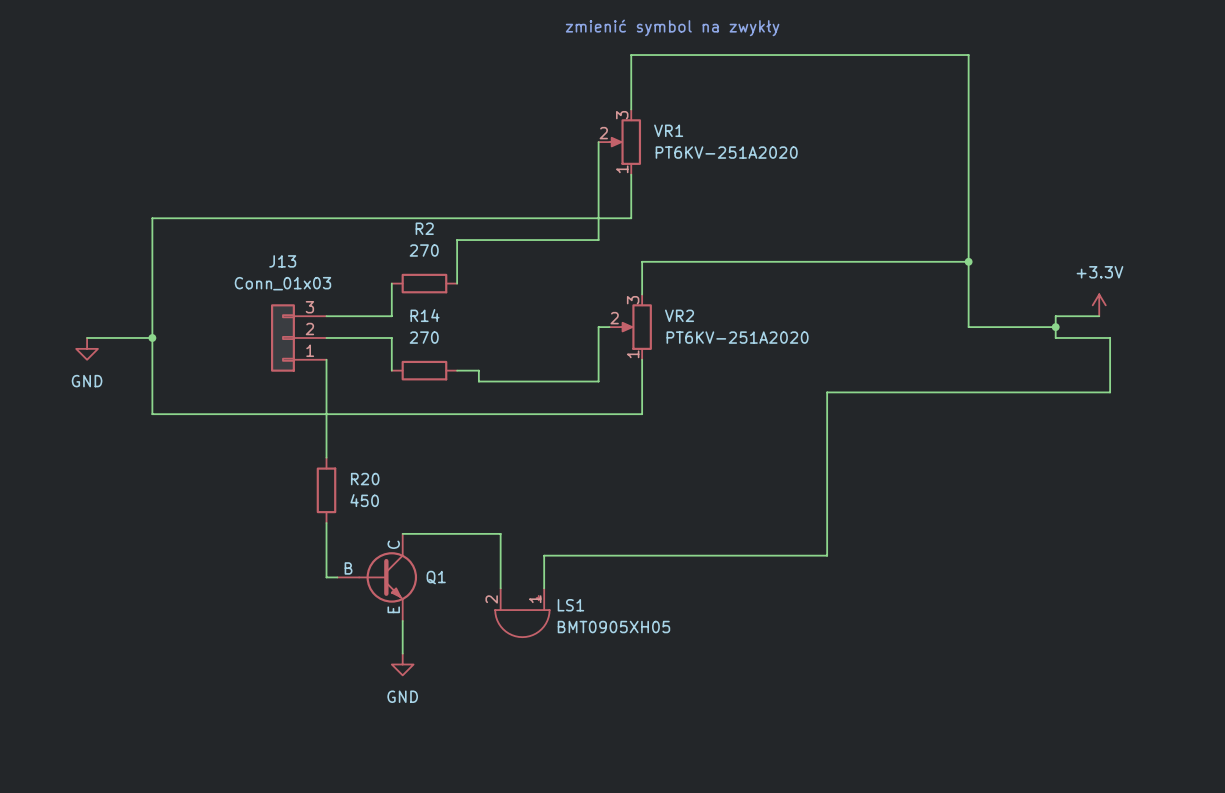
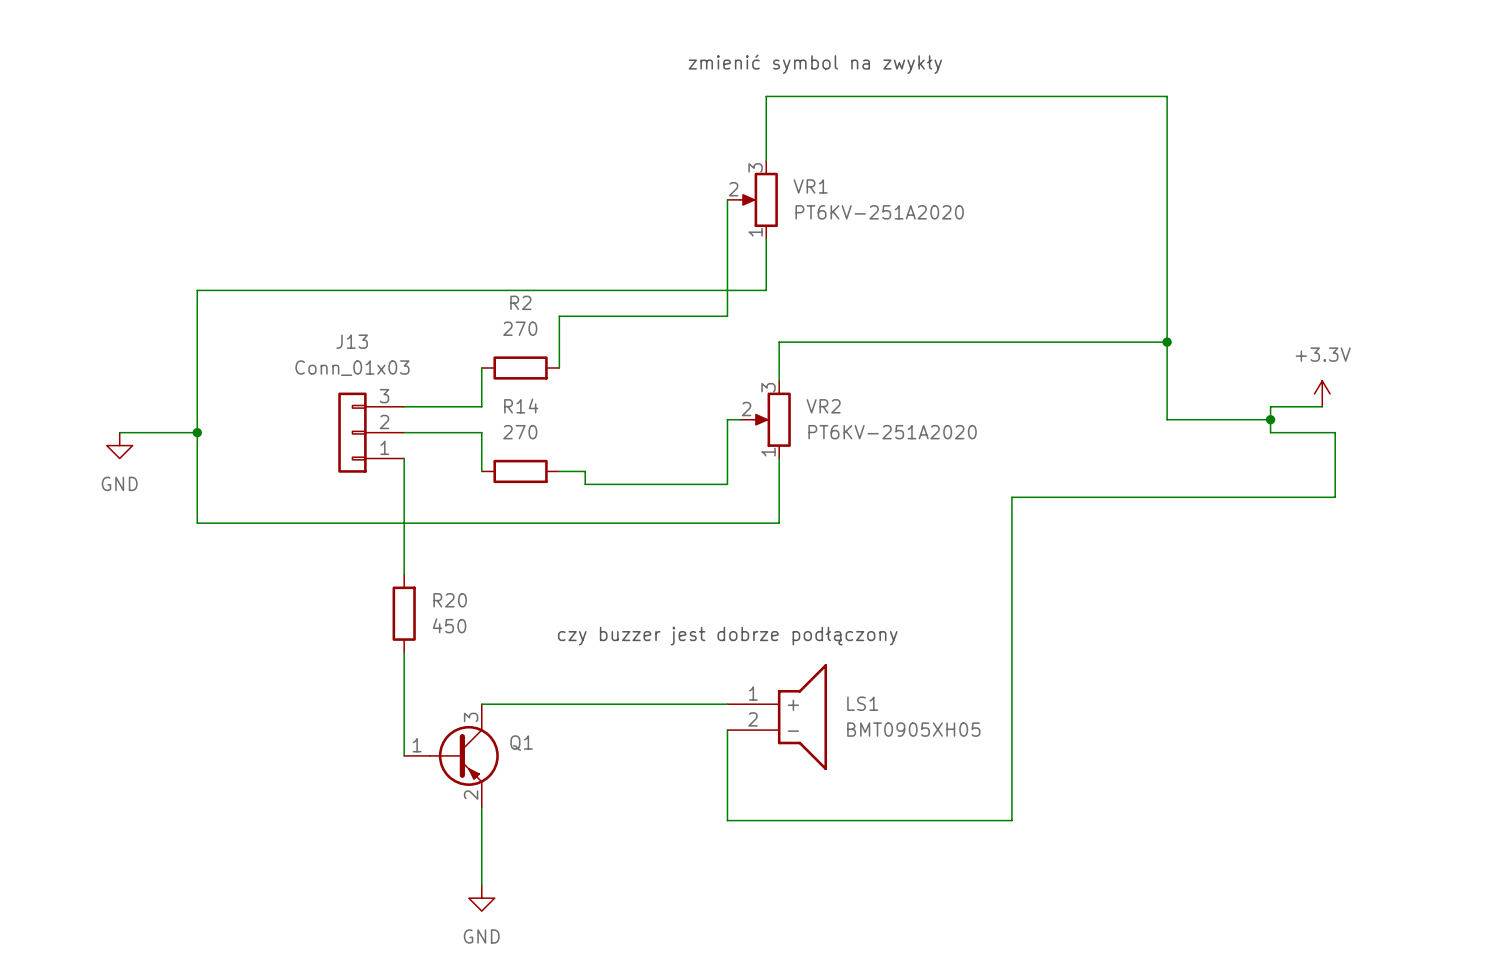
wire: (838, 392) (827, 392) (827, 555) (544, 555) (544, 588) -> (1011, 497) (1011, 820) (727, 820) (727, 730)
text: none -> czy buzzer jest dobrze podłączony (727, 636)
Q1 symbol: [337, 533, 418, 621] -> [404, 704, 499, 808]
wire: (402, 533) (500, 533) (500, 588) -> none
wire: none -> (481, 704) (727, 704)
wire: (326, 577) (337, 577) -> (404, 717) (404, 755)
LS1 symbol: [495, 588, 550, 638] -> [727, 664, 828, 771]
LS1 name position: LS1 (570, 605) -> LS1 (862, 703)
wire: (402, 620) (402, 653) -> none
LS1 value position: BMT0905XH05 (613, 627) -> BMT0905XH05 (913, 729)
wire: none -> (481, 807) (481, 885)
power symbol position: GND (402, 664) -> GND (481, 898)

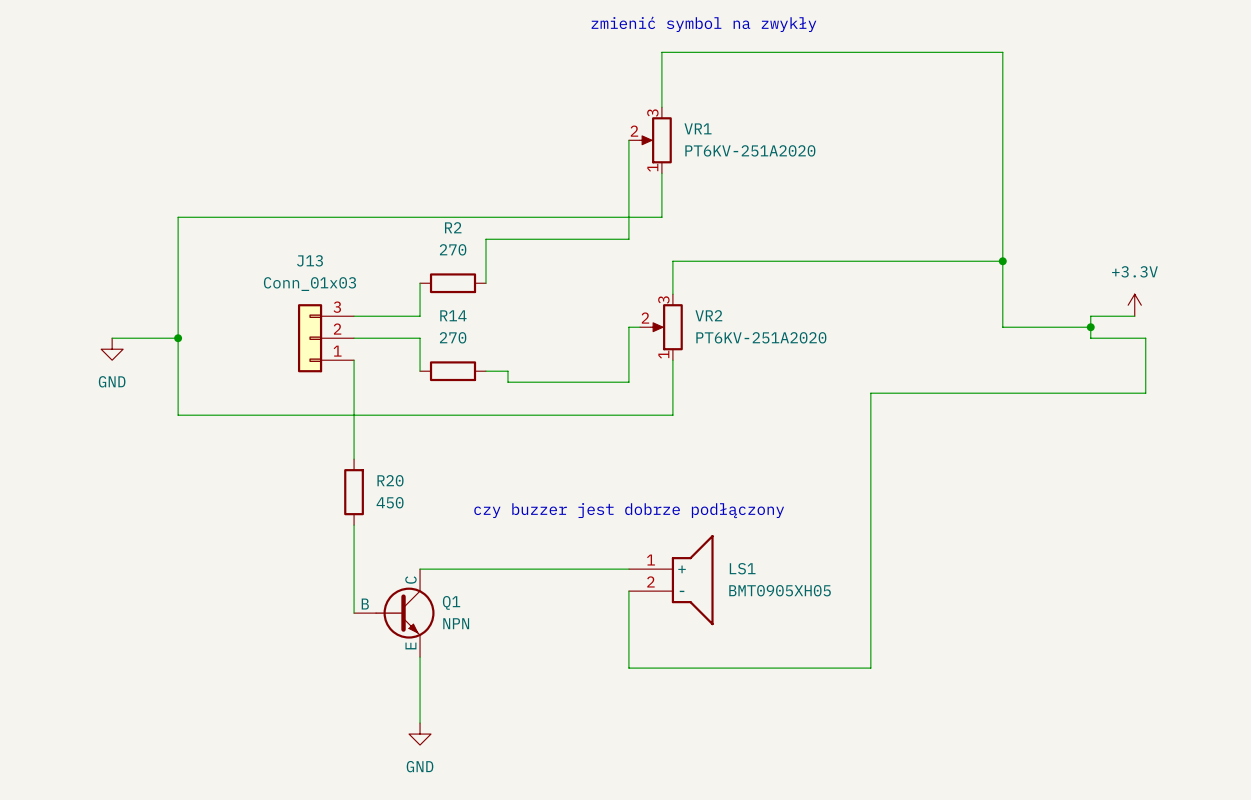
Q1 symbol: [404, 704, 499, 808] -> [354, 569, 435, 658]
Q1 value: none -> NPN (456, 623)

